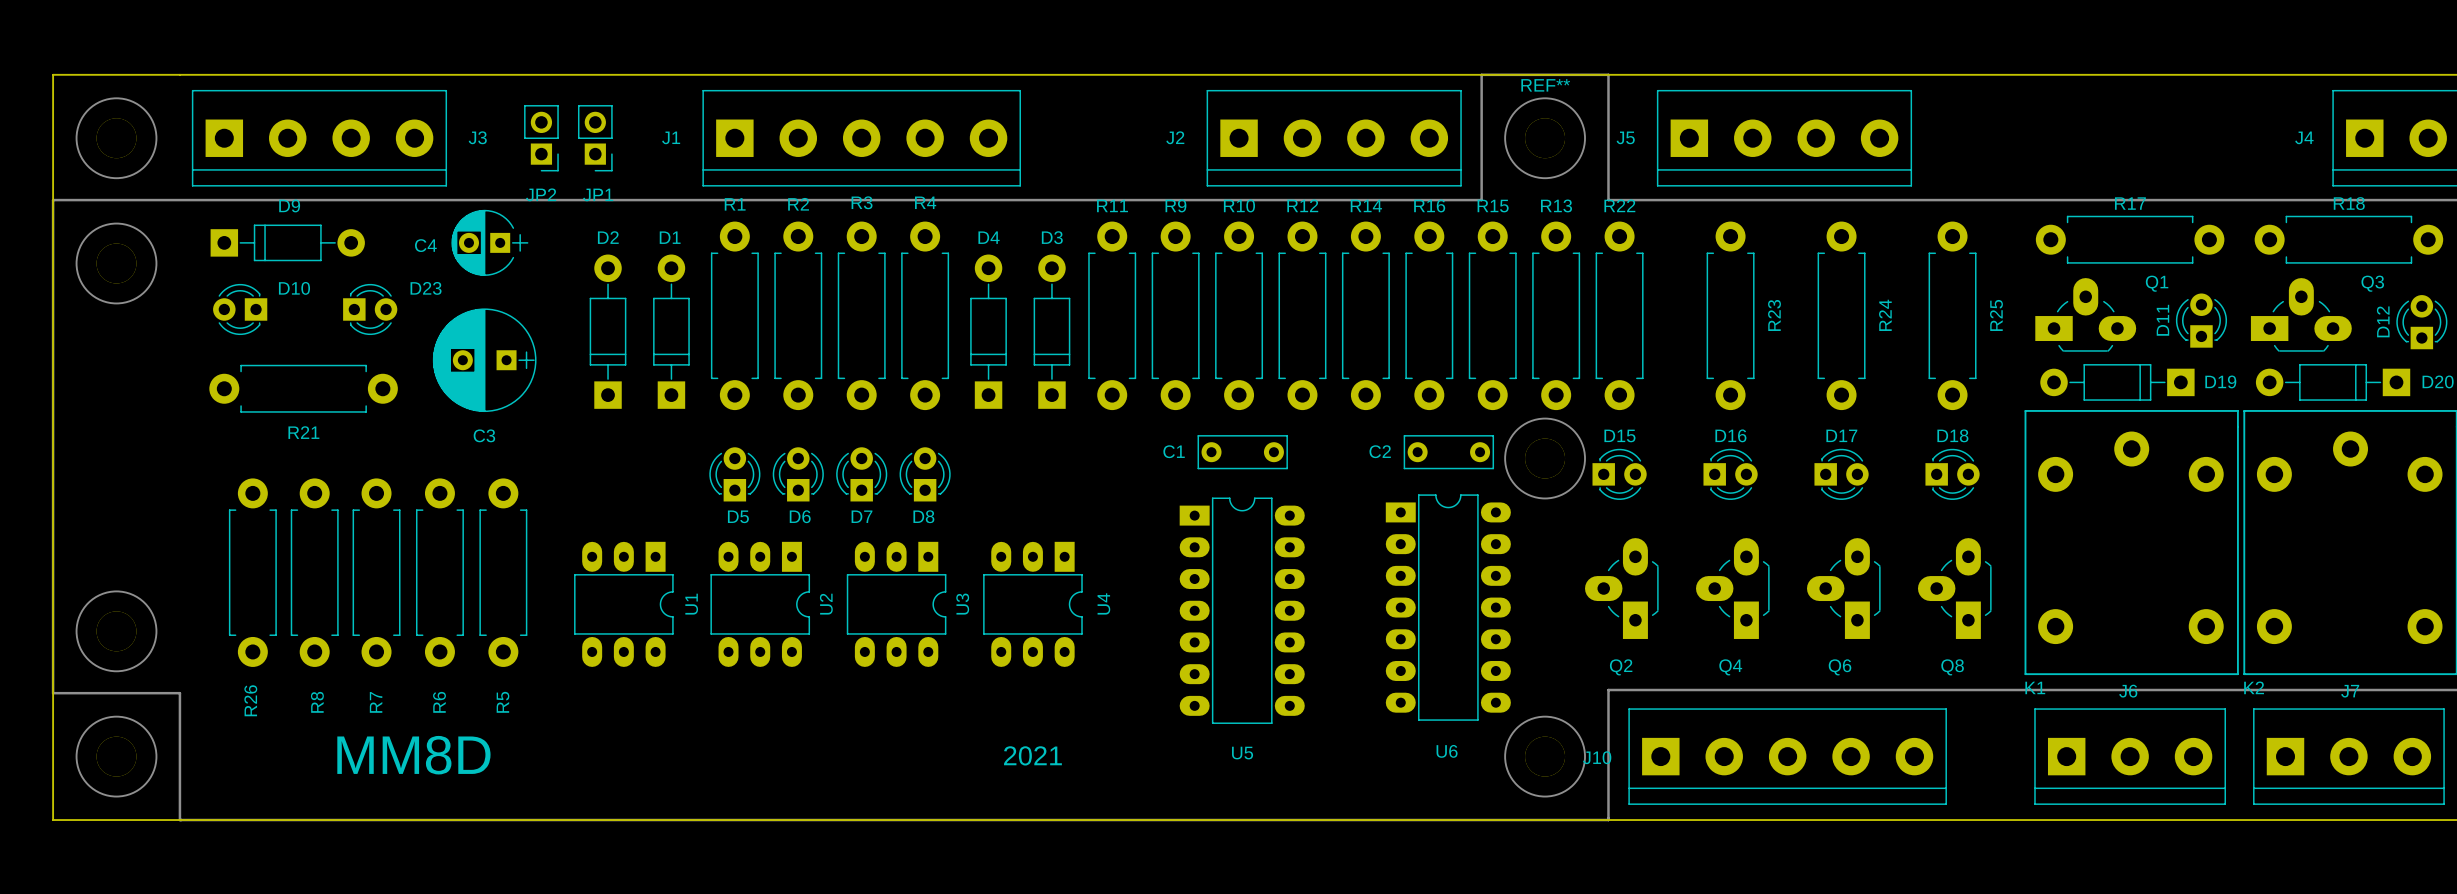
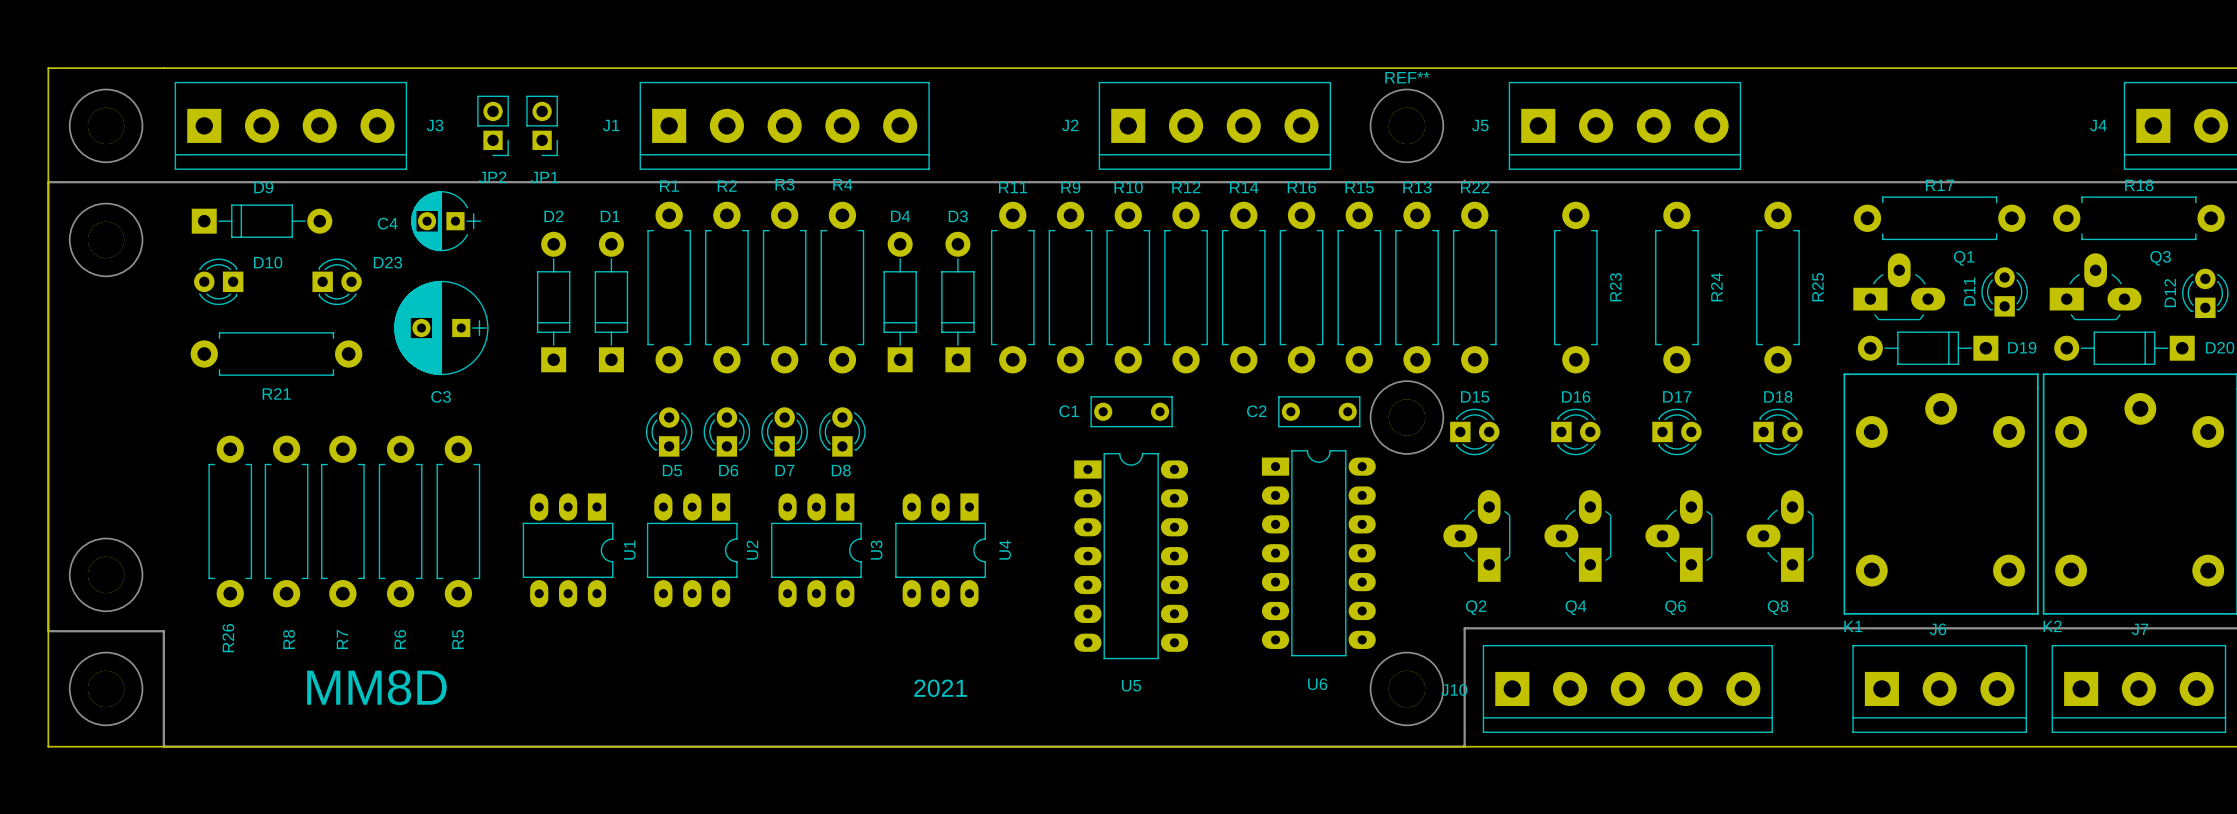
line: (1608, 198) (1608, 74) (1481, 74) (1481, 200) -> (1464, 182) (1349, 182)

